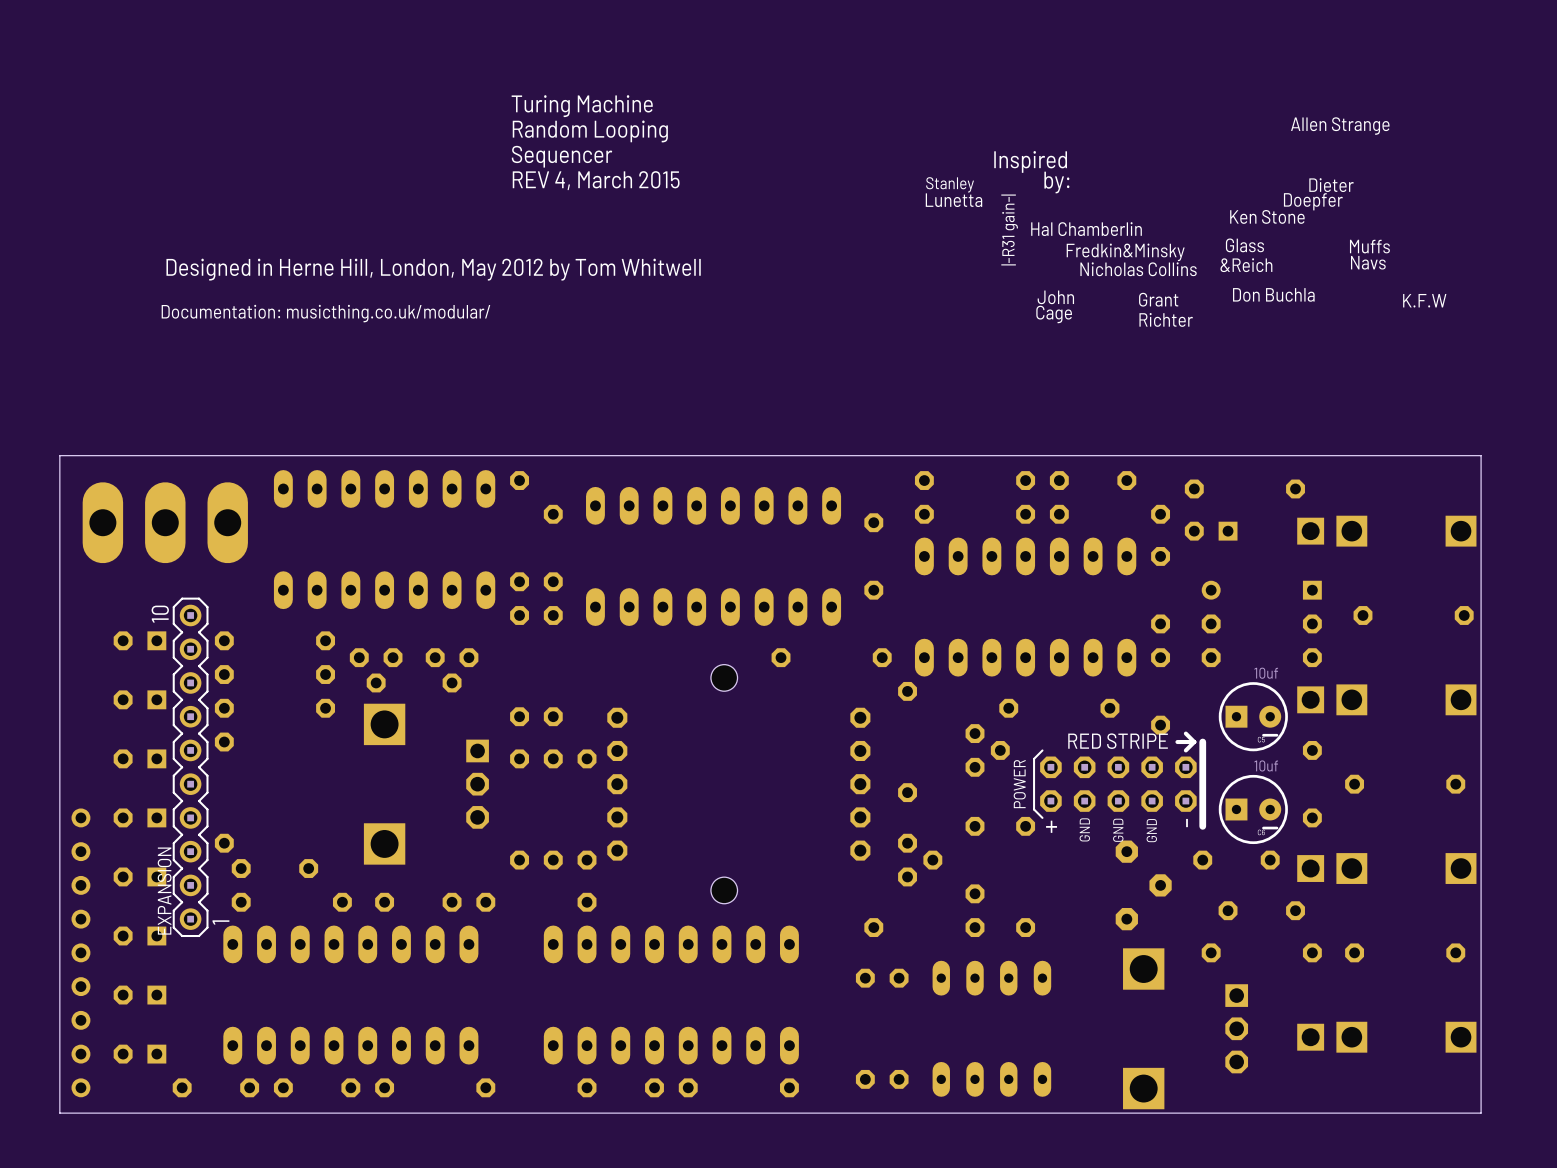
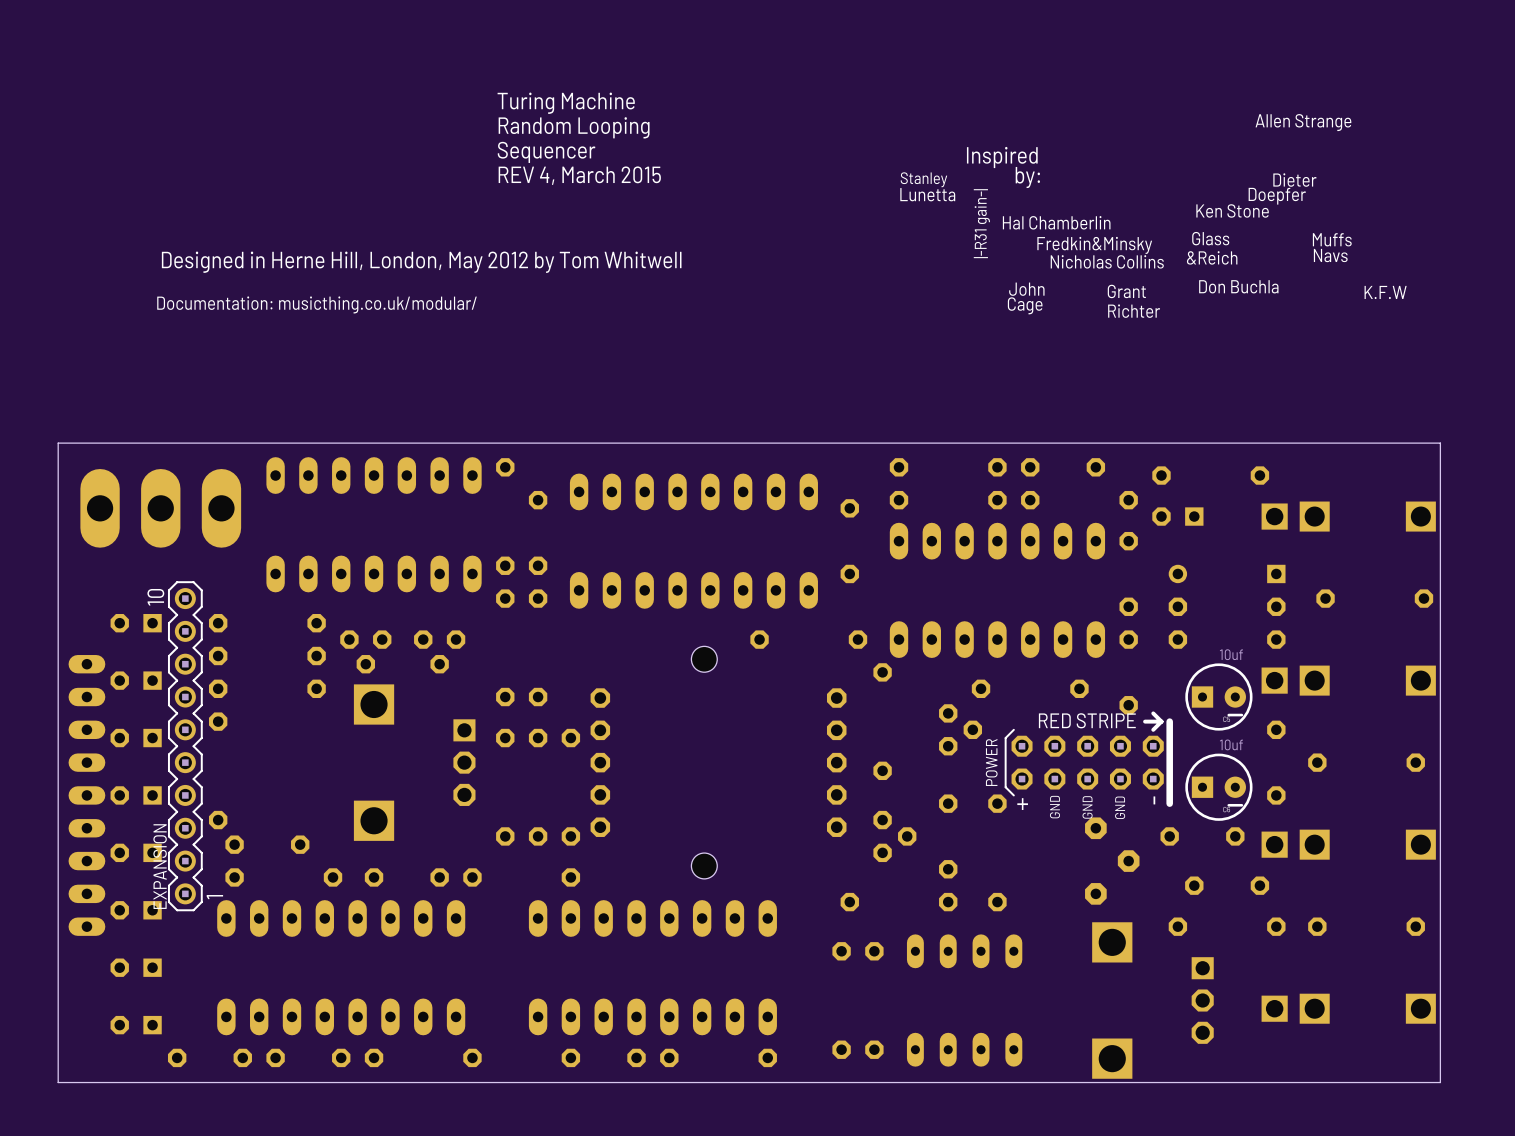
part: none -> (86, 795)
part: (80, 952) -> none

